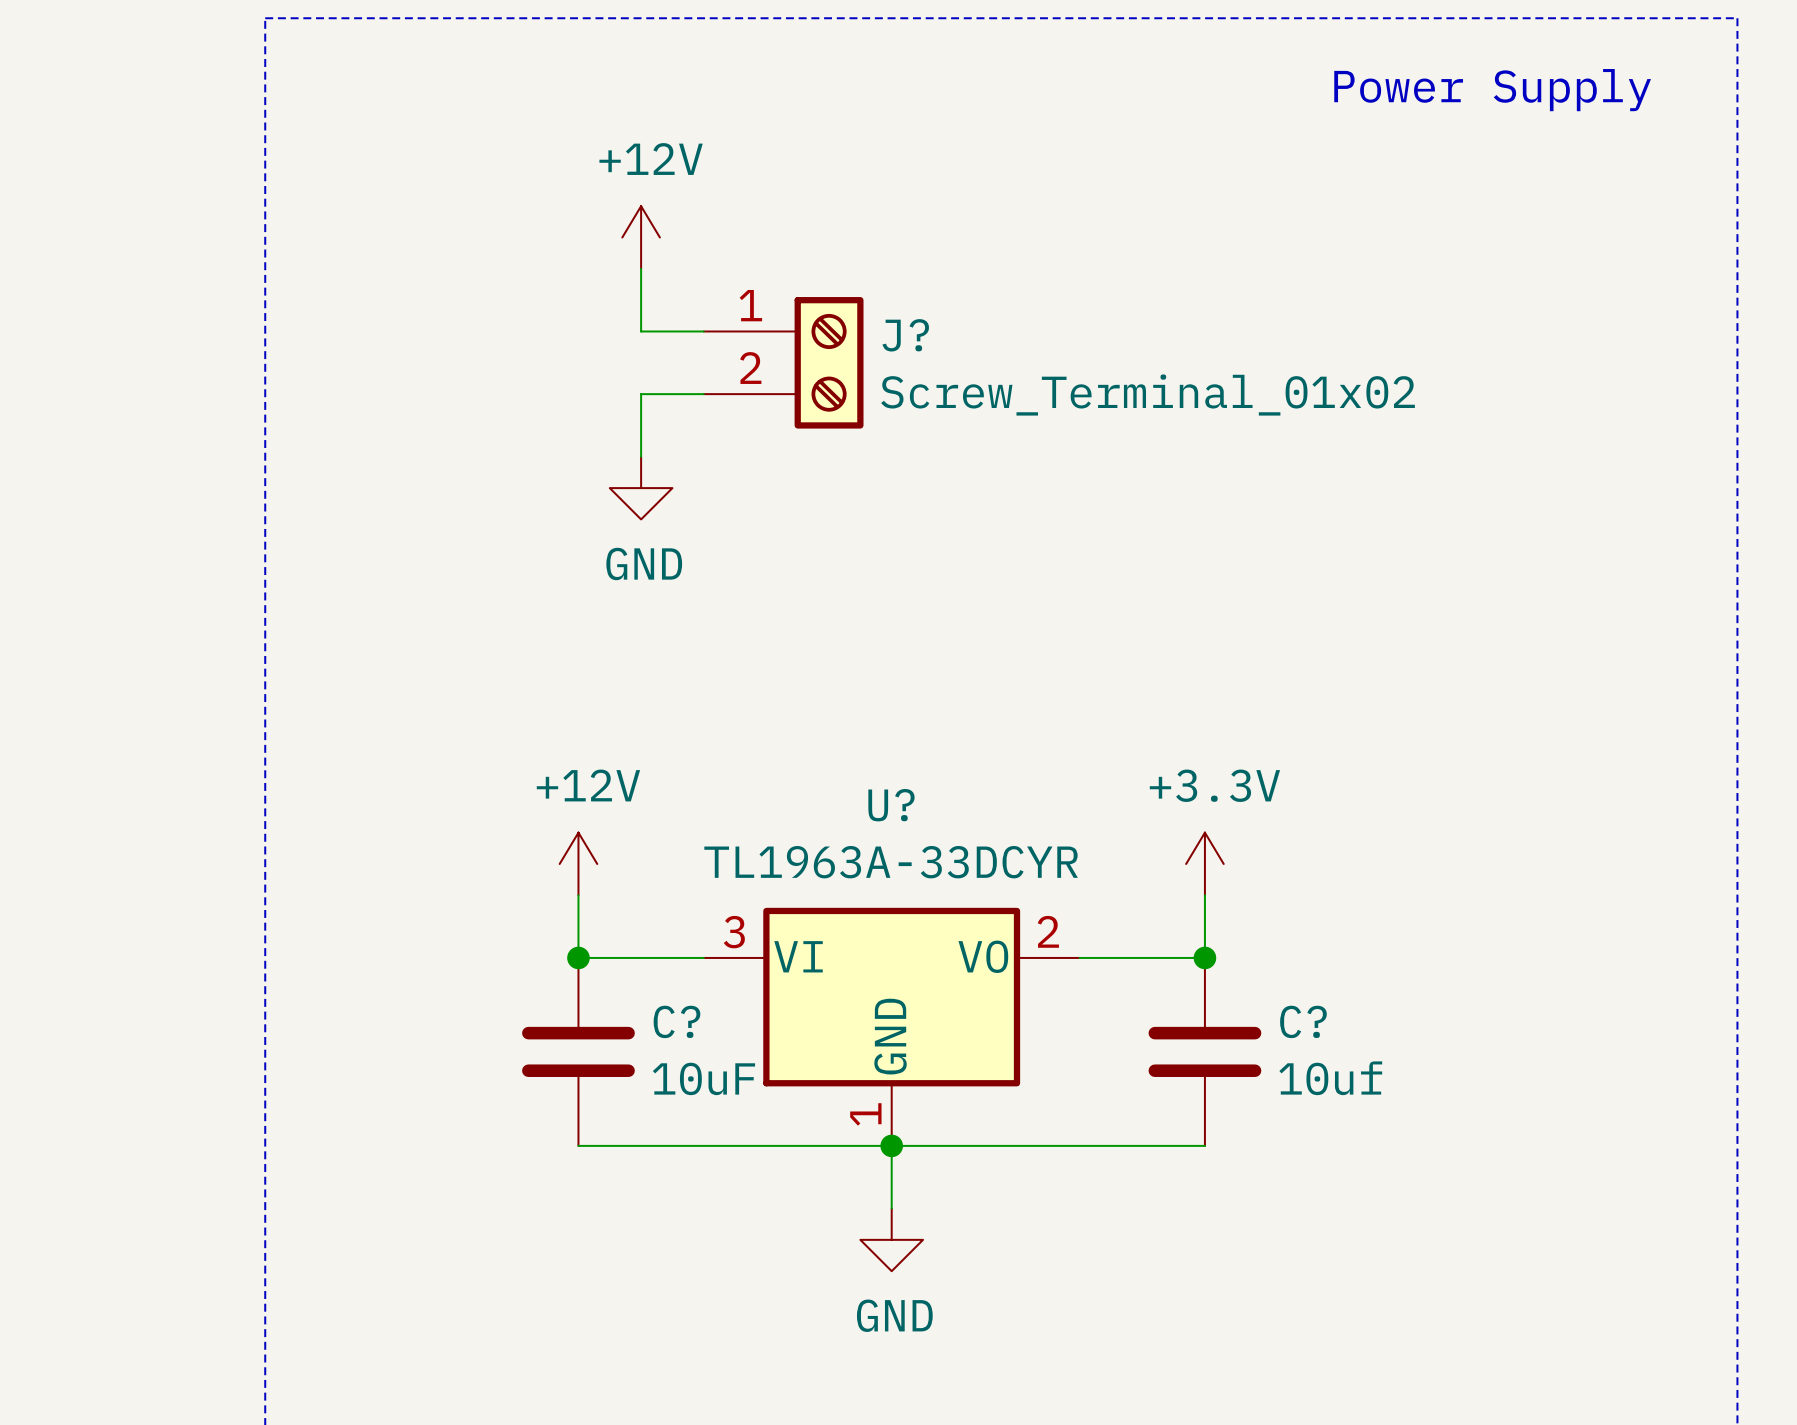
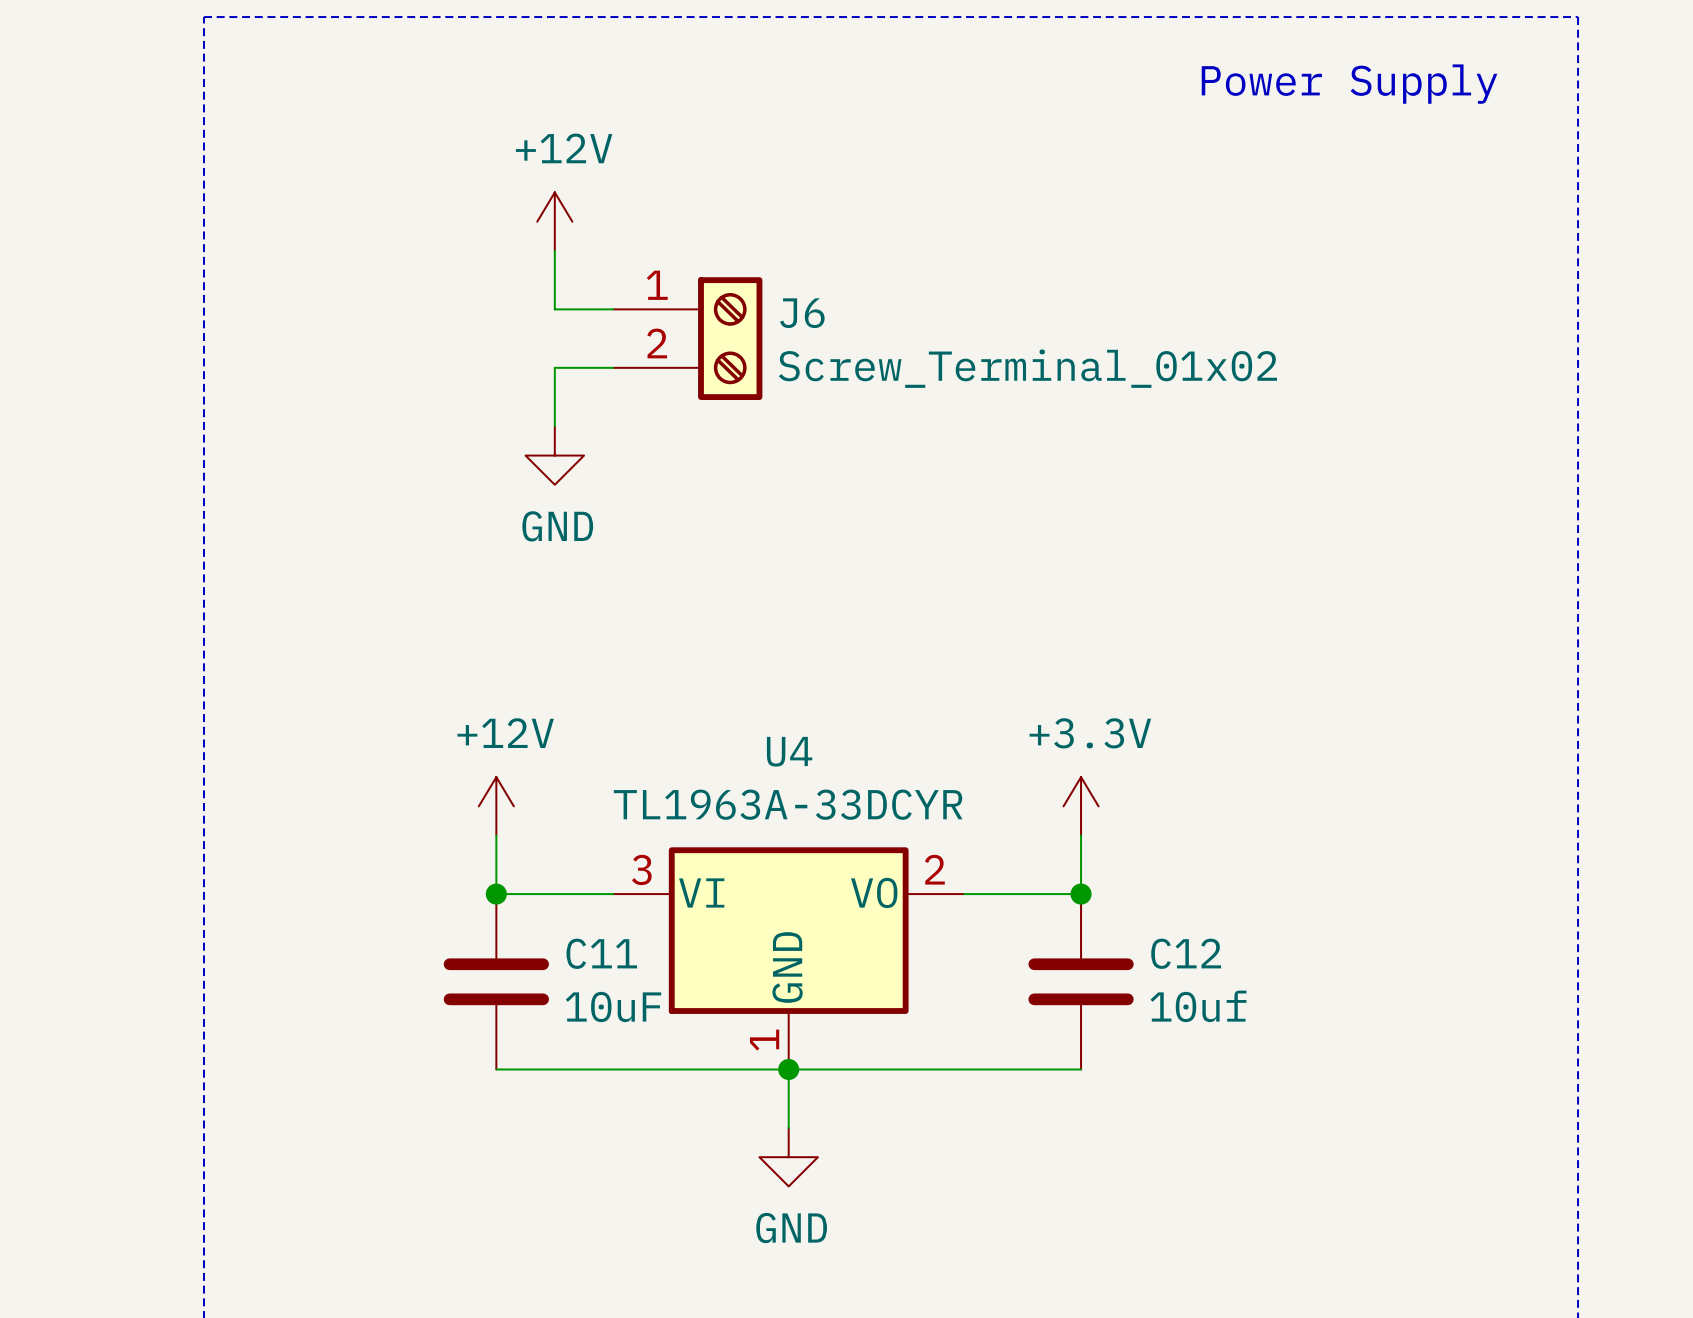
J? name: J? (905, 335) -> J6 (802, 313)
U? name: U? (891, 805) -> U4 (789, 751)
C? name: C? (676, 1021) -> C11 (601, 953)
C? name: C? (1303, 1021) -> C12 (1186, 953)

